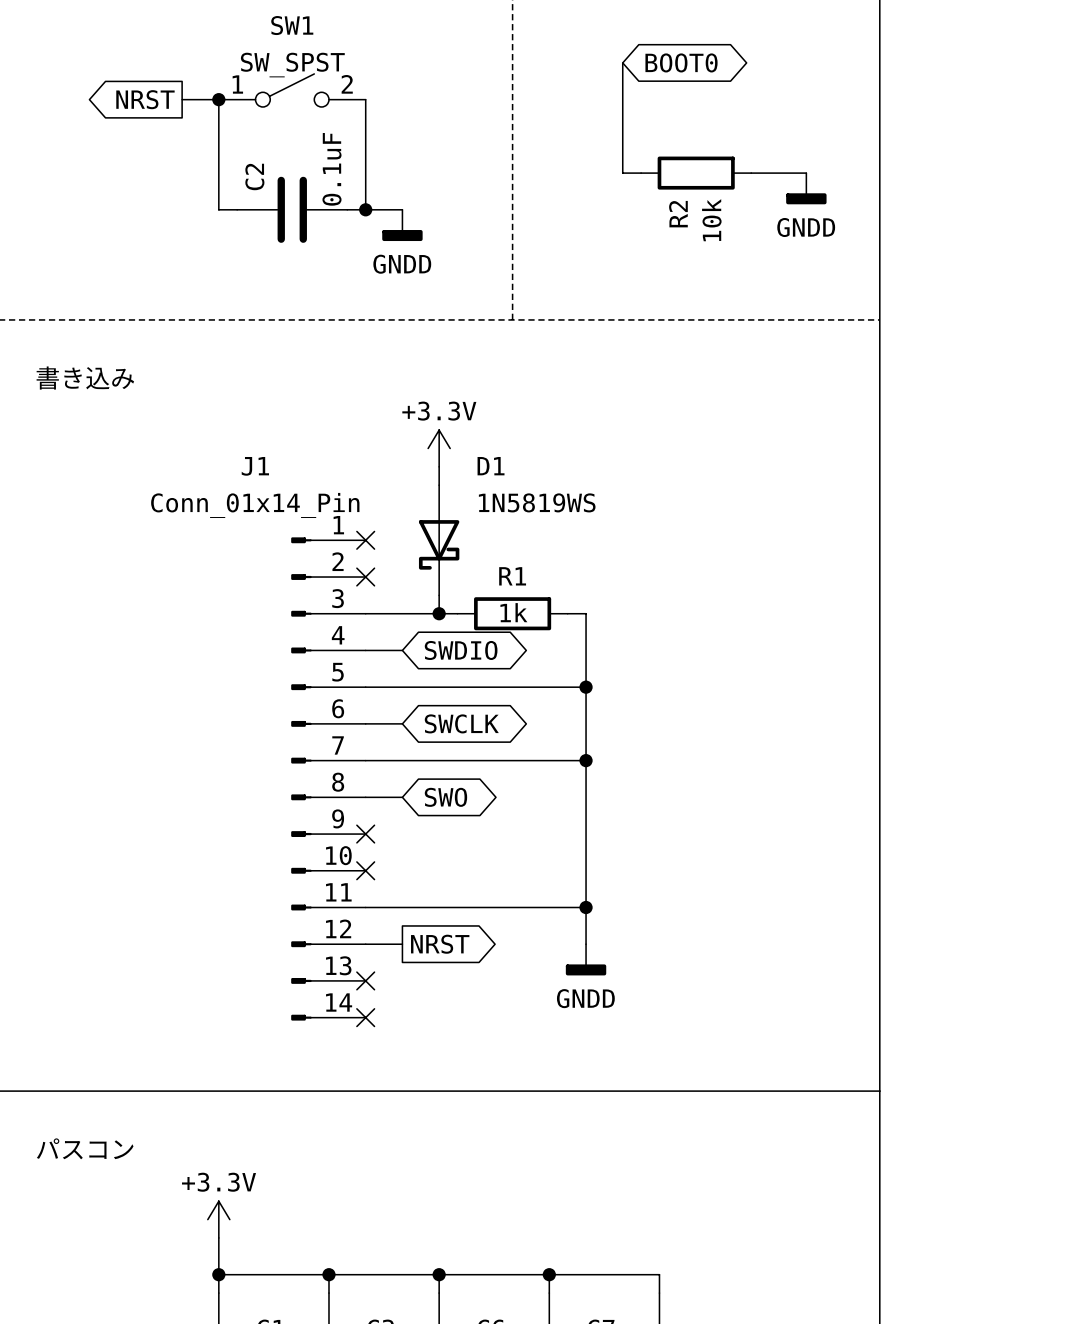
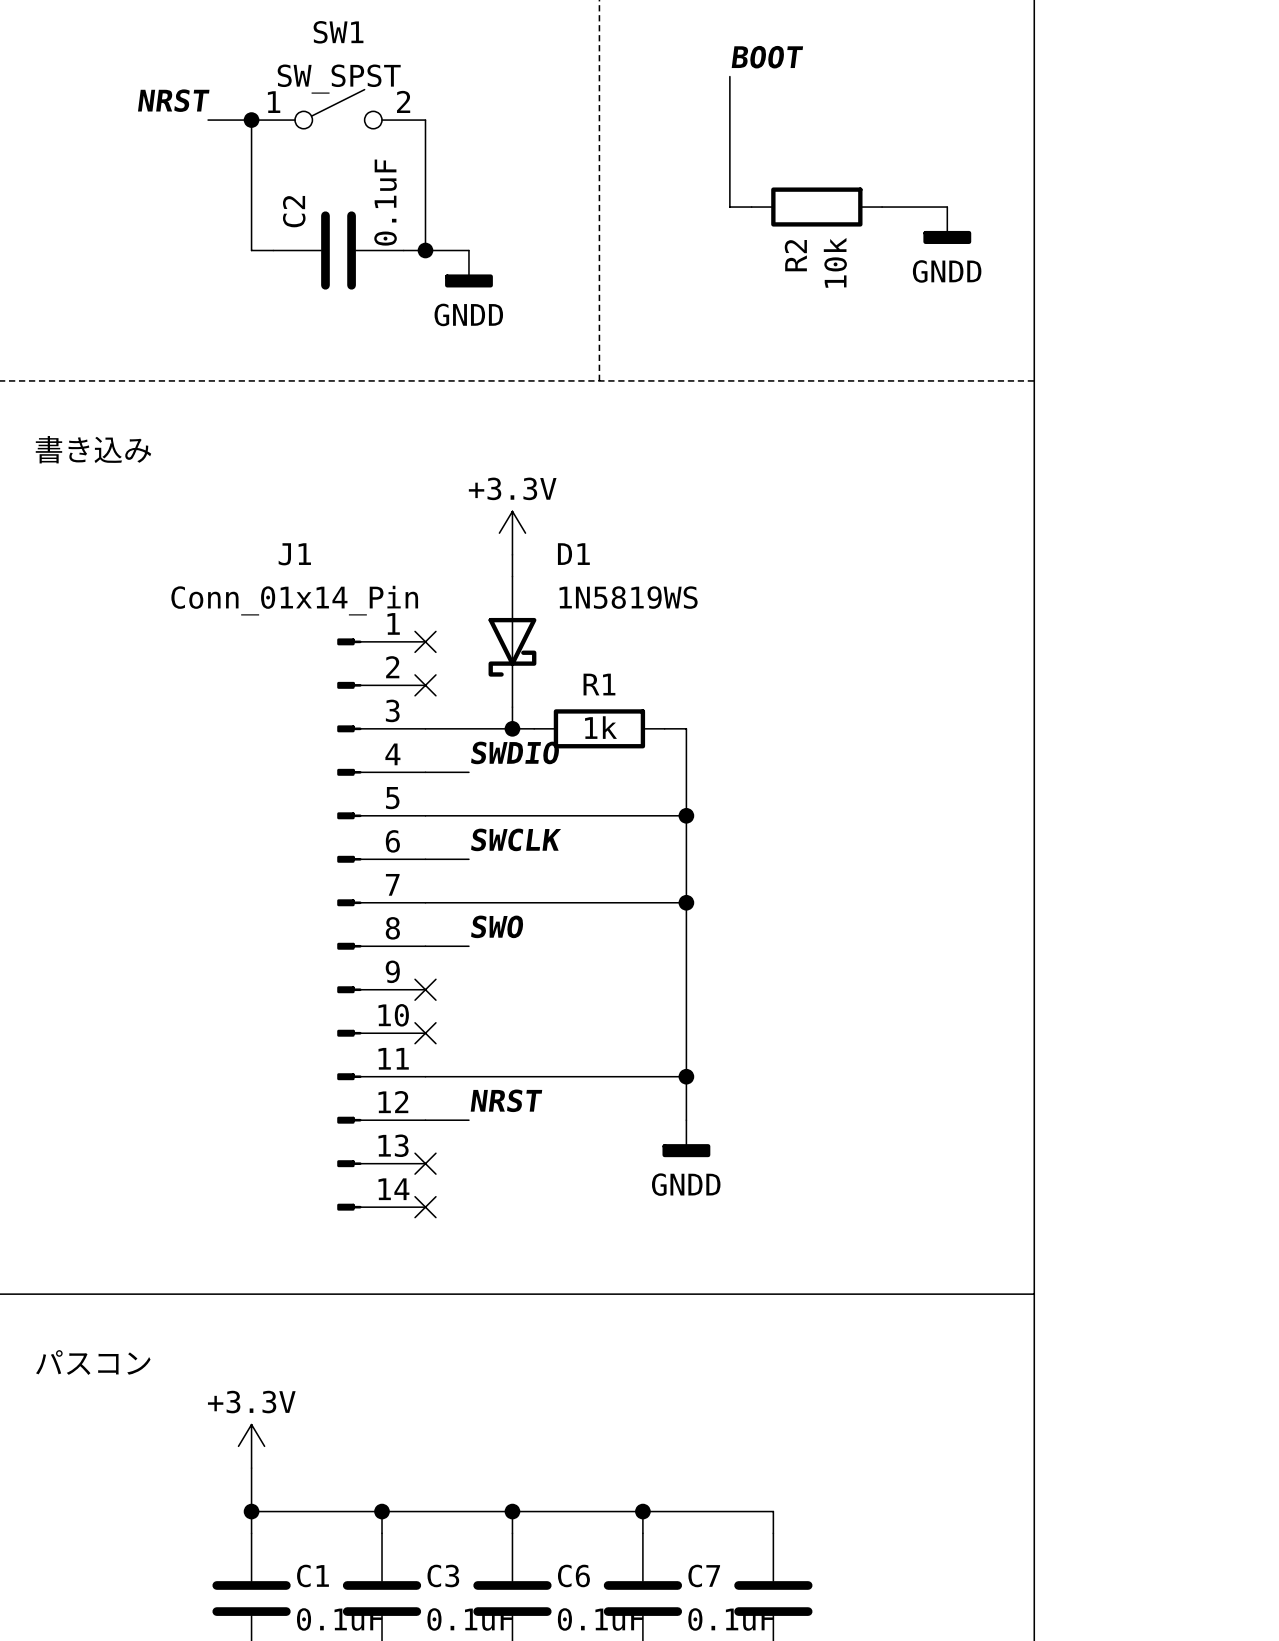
label: none -> BOOT (767, 57)
global label: BOOT0 (681, 62) -> none
label: none -> NRST (173, 100)
global label: NRST (145, 99) -> none
label: none -> SWDIO (515, 752)
global label: SWDIO (461, 650) -> none
label: none -> SWCLK (516, 839)
global label: SWCLK (461, 723) -> none
label: none -> SWO (497, 926)
global label: SWO (445, 797) -> none
label: none -> NRST (506, 1100)
global label: NRST (440, 944) -> none

